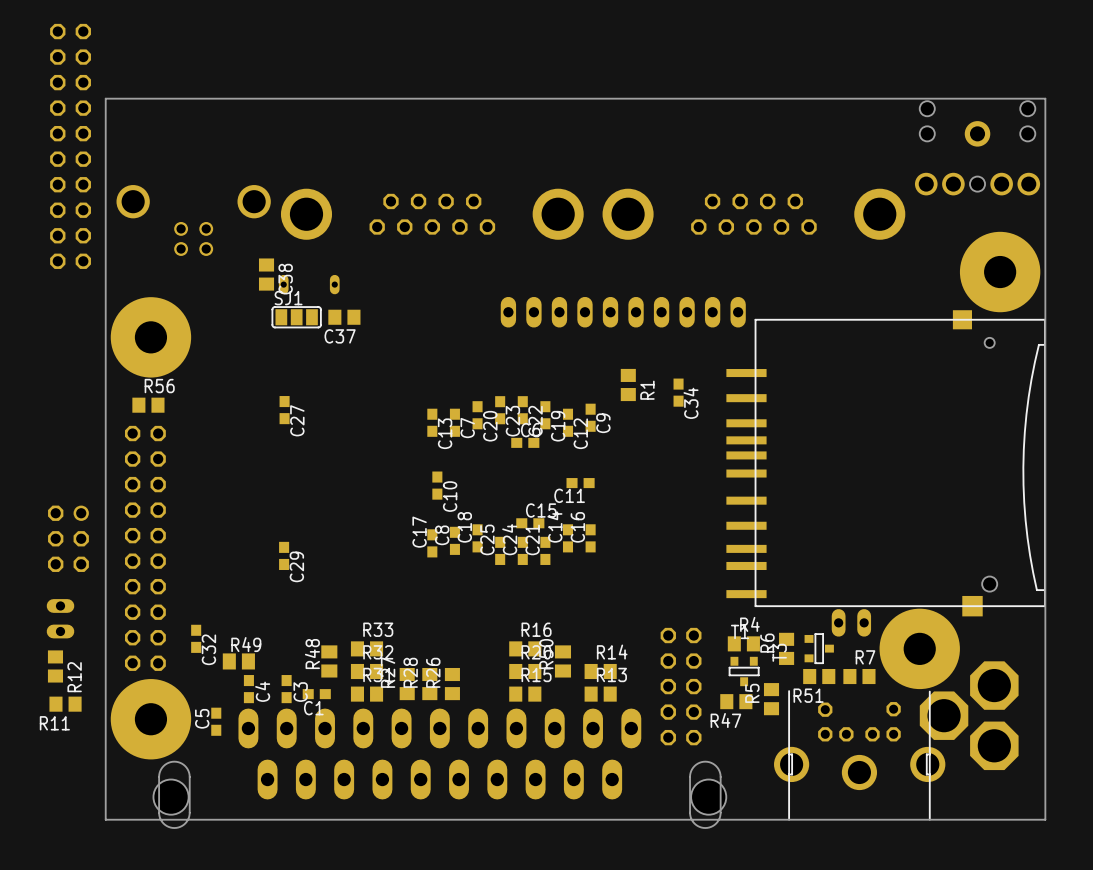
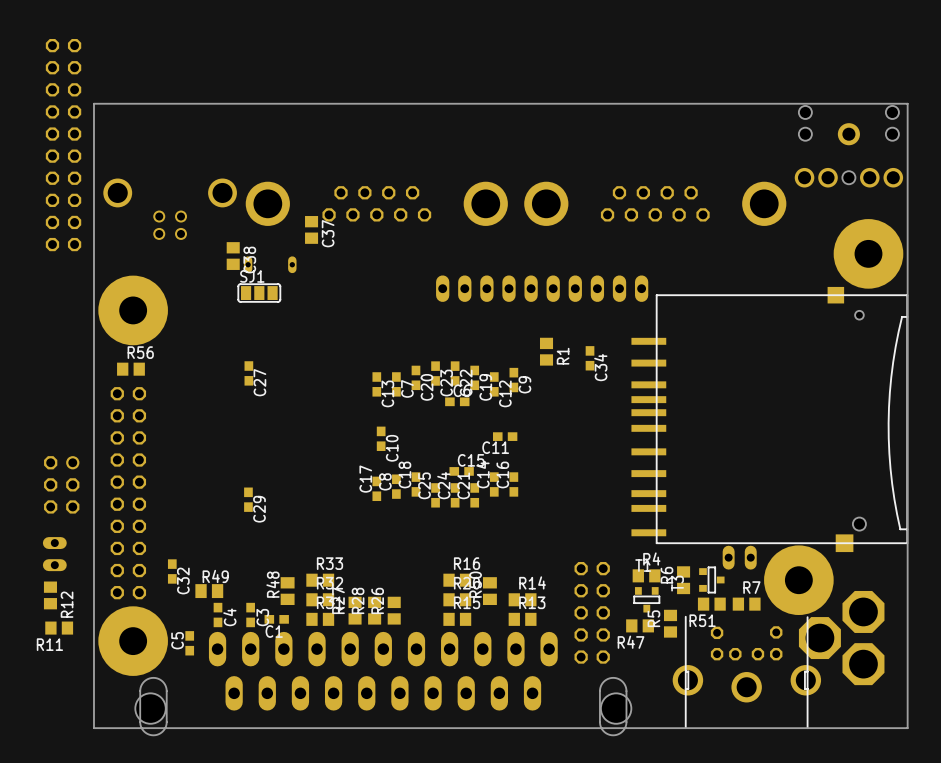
C37 rotation: 0° (344, 317) -> 90° clockwise (311, 229)
C37 position: (344, 317) -> (311, 229)
C37 name position: C37 (340, 336) -> C37 (328, 233)

